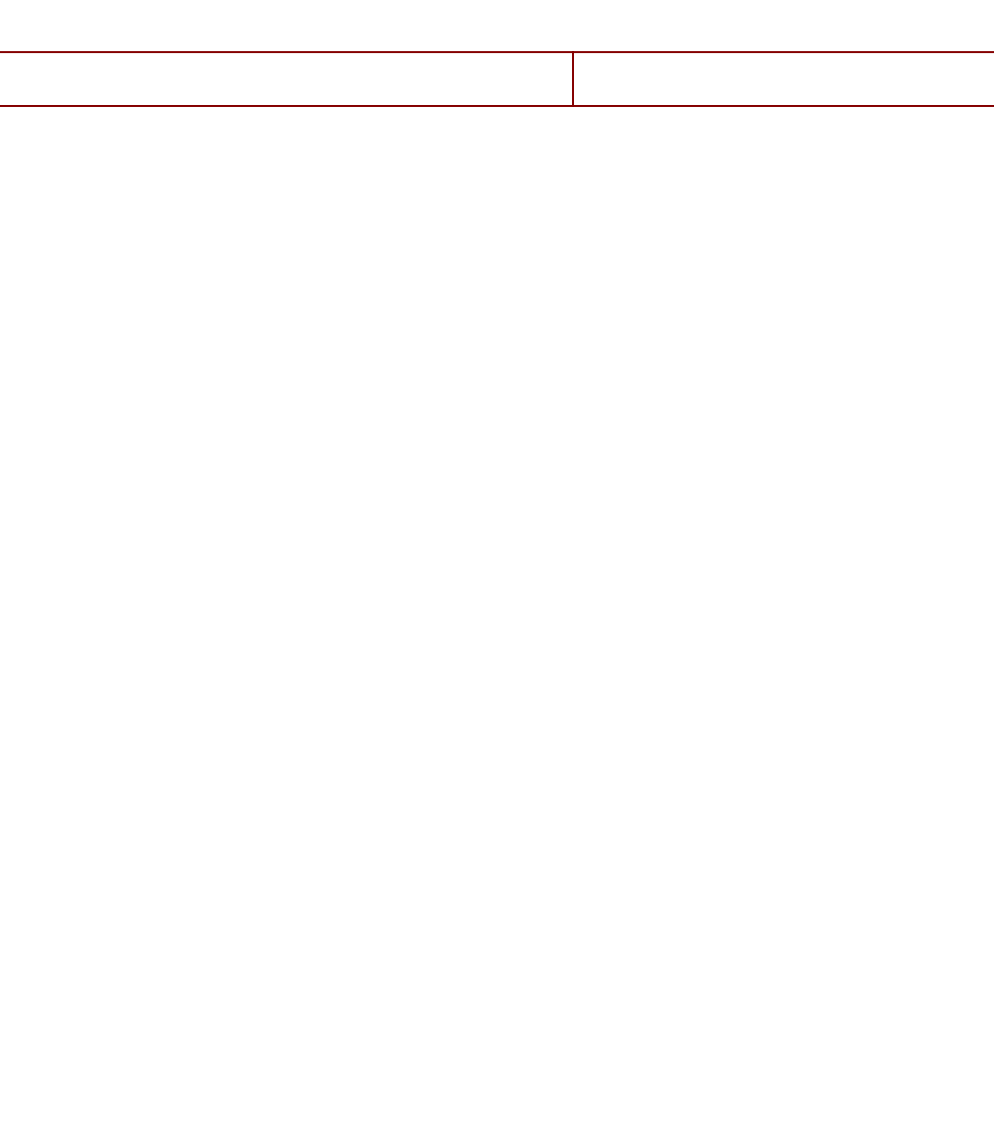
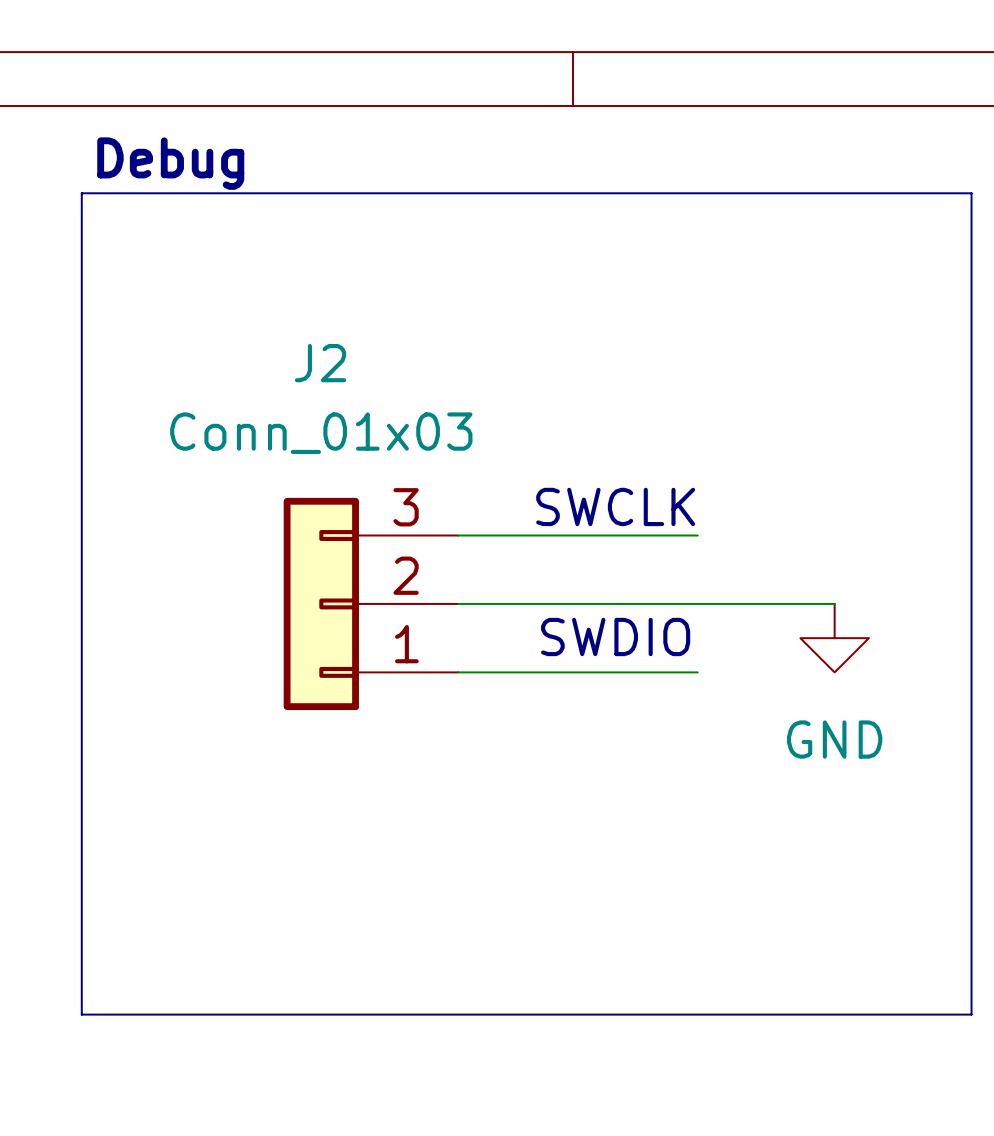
text: none -> Debug (170, 163)
line: none -> (81, 193) (971, 193) (971, 1014) (81, 1014) (81, 193)
text: none -> SWCLK (615, 506)
wire: none -> (458, 535) (697, 535)
J2: none -> Conn_01x03 (370, 603)
wire: none -> (458, 603) (834, 603)
text: none -> SWDIO (615, 636)
power symbol: none -> GND (834, 638)
wire: none -> (458, 672) (697, 672)

